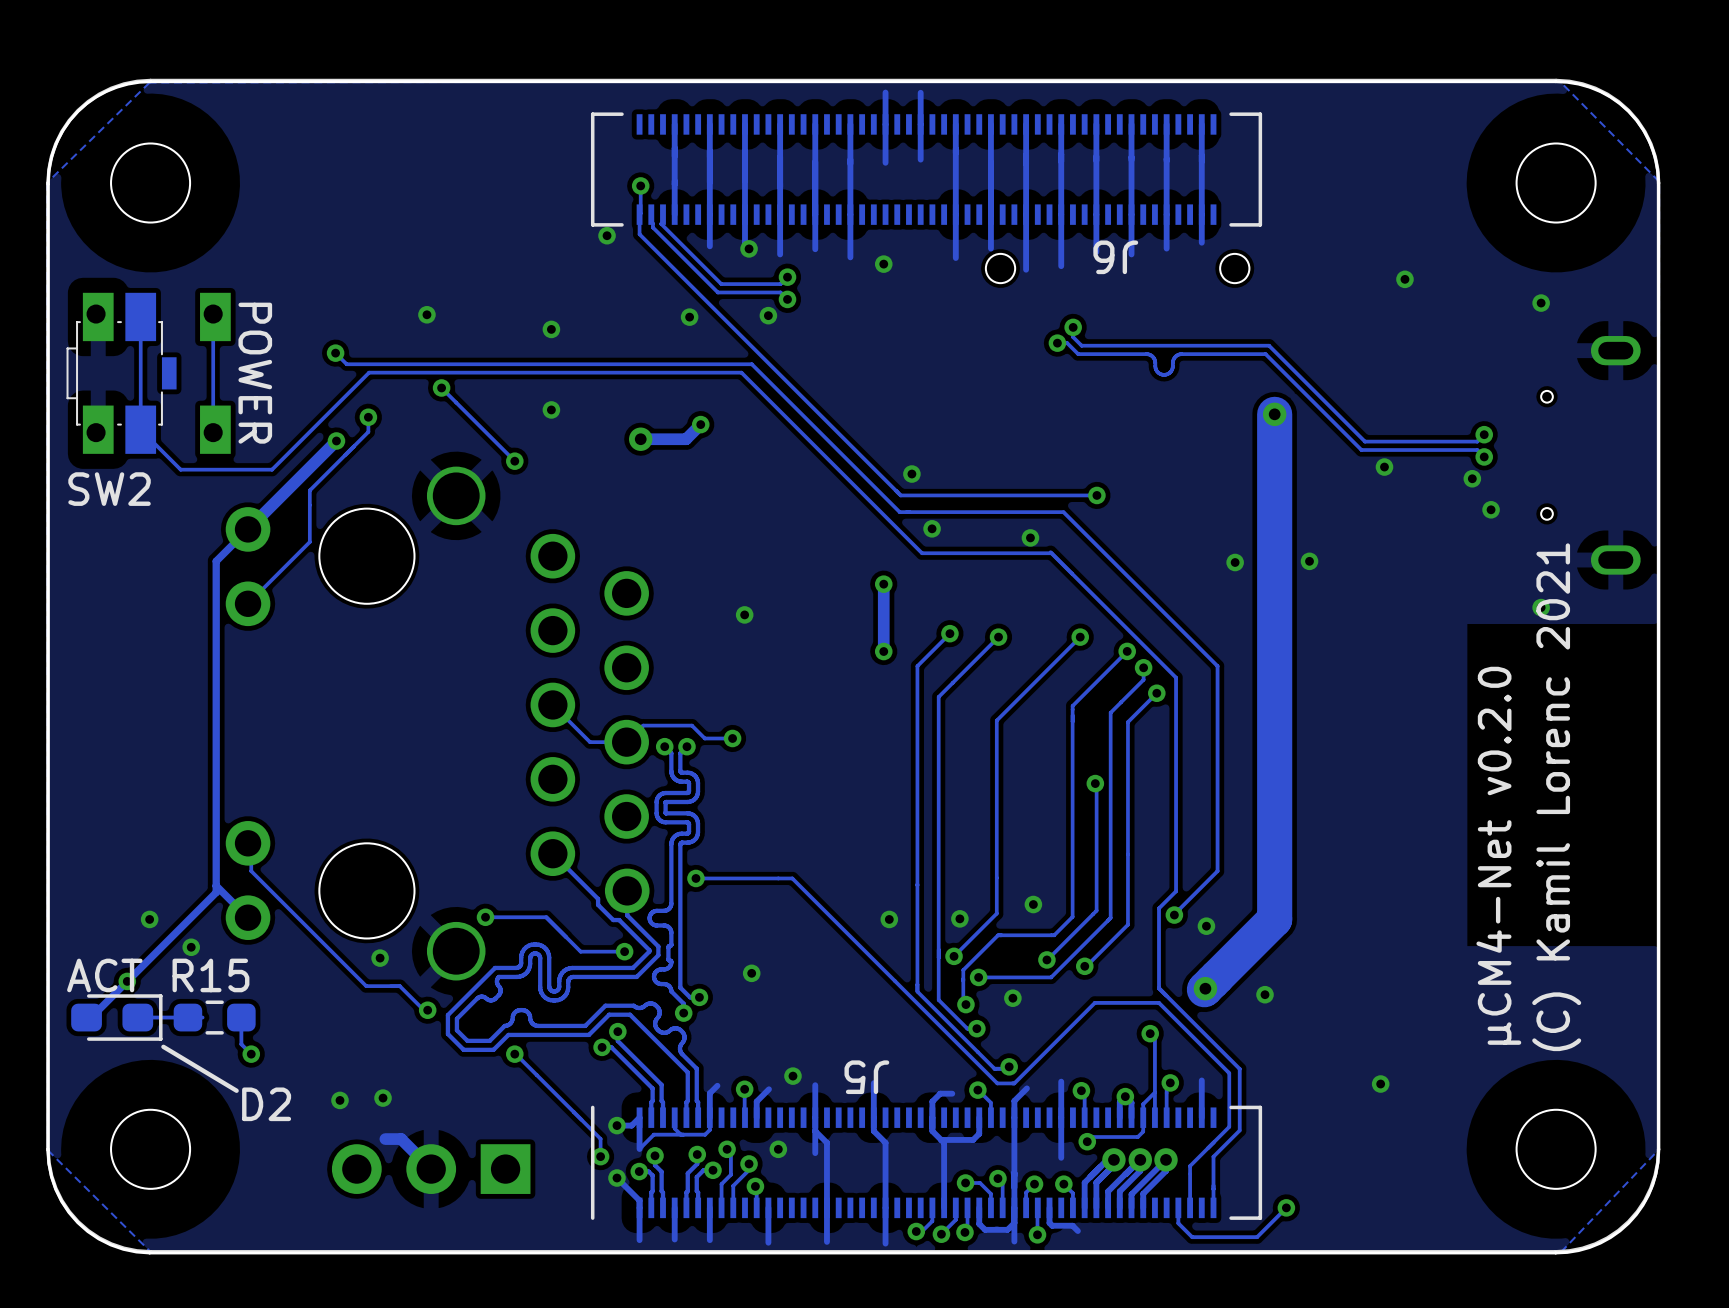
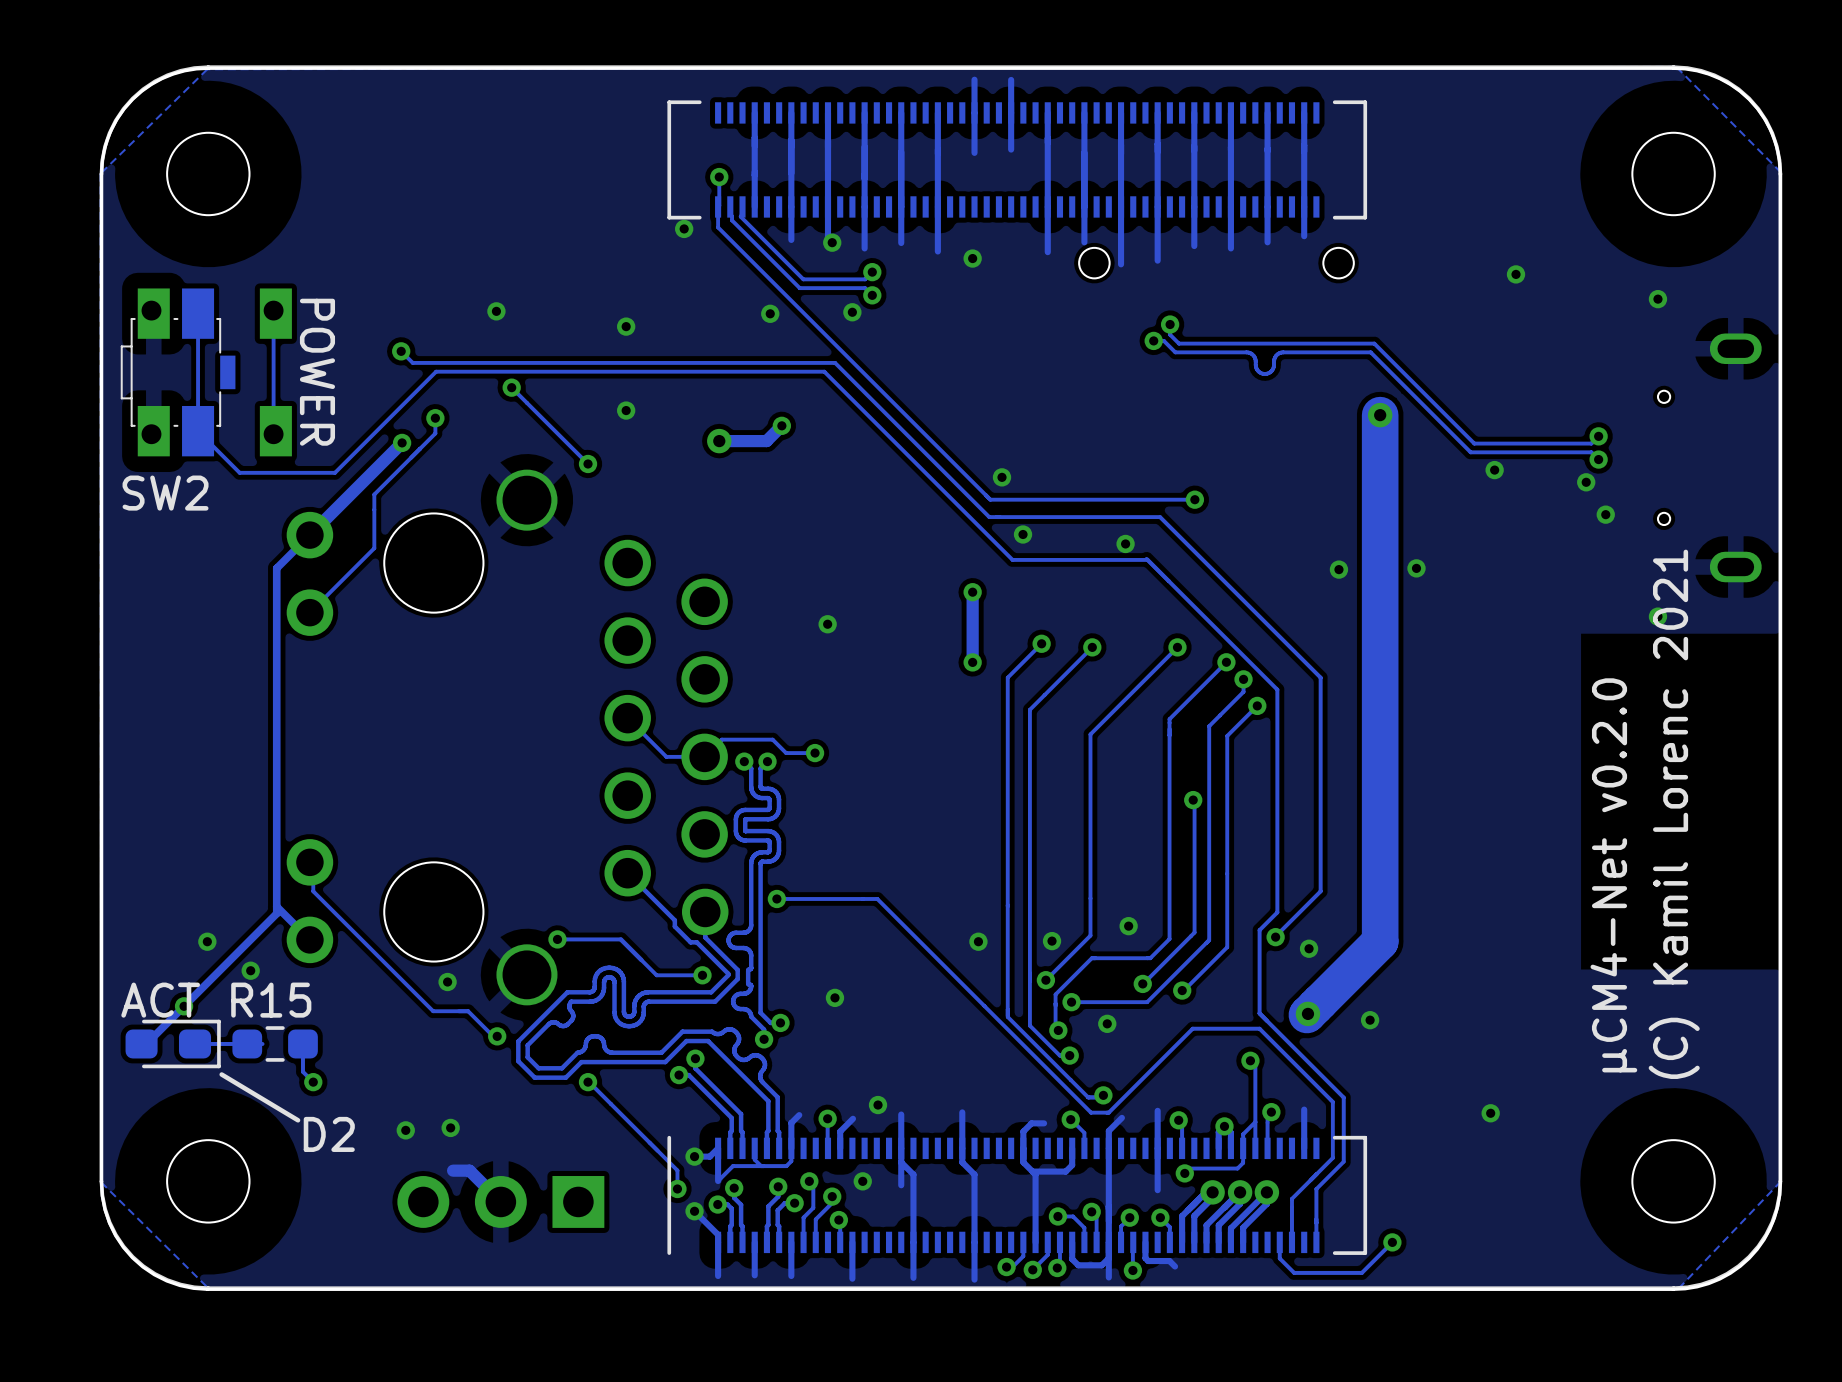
J6: (1115, 257) -> none
J5: (866, 1077) -> none

